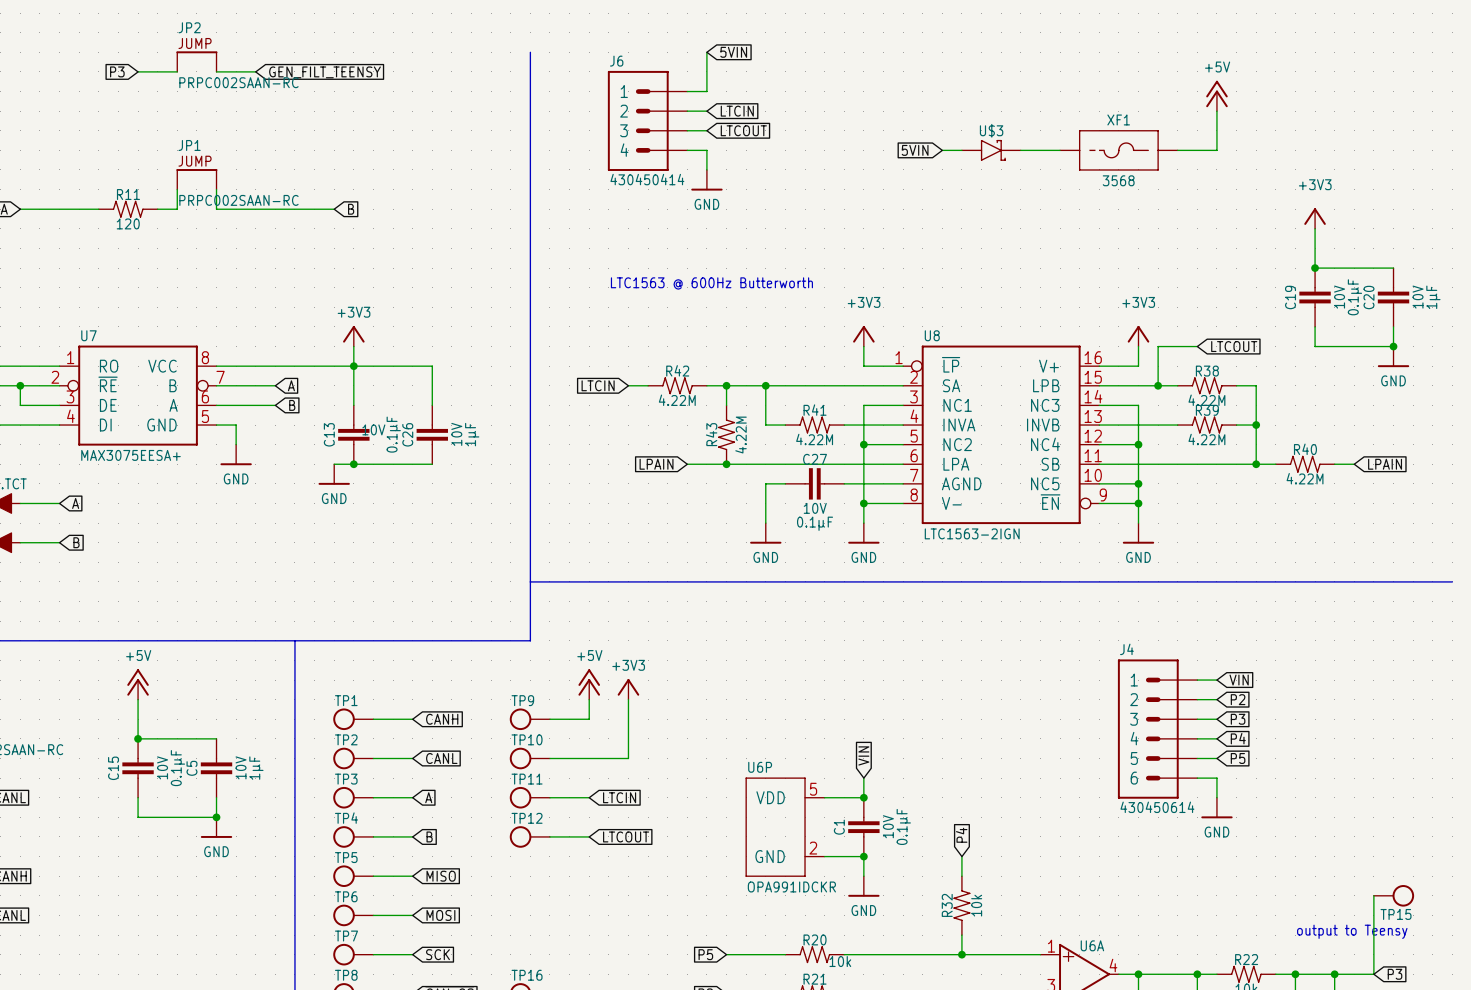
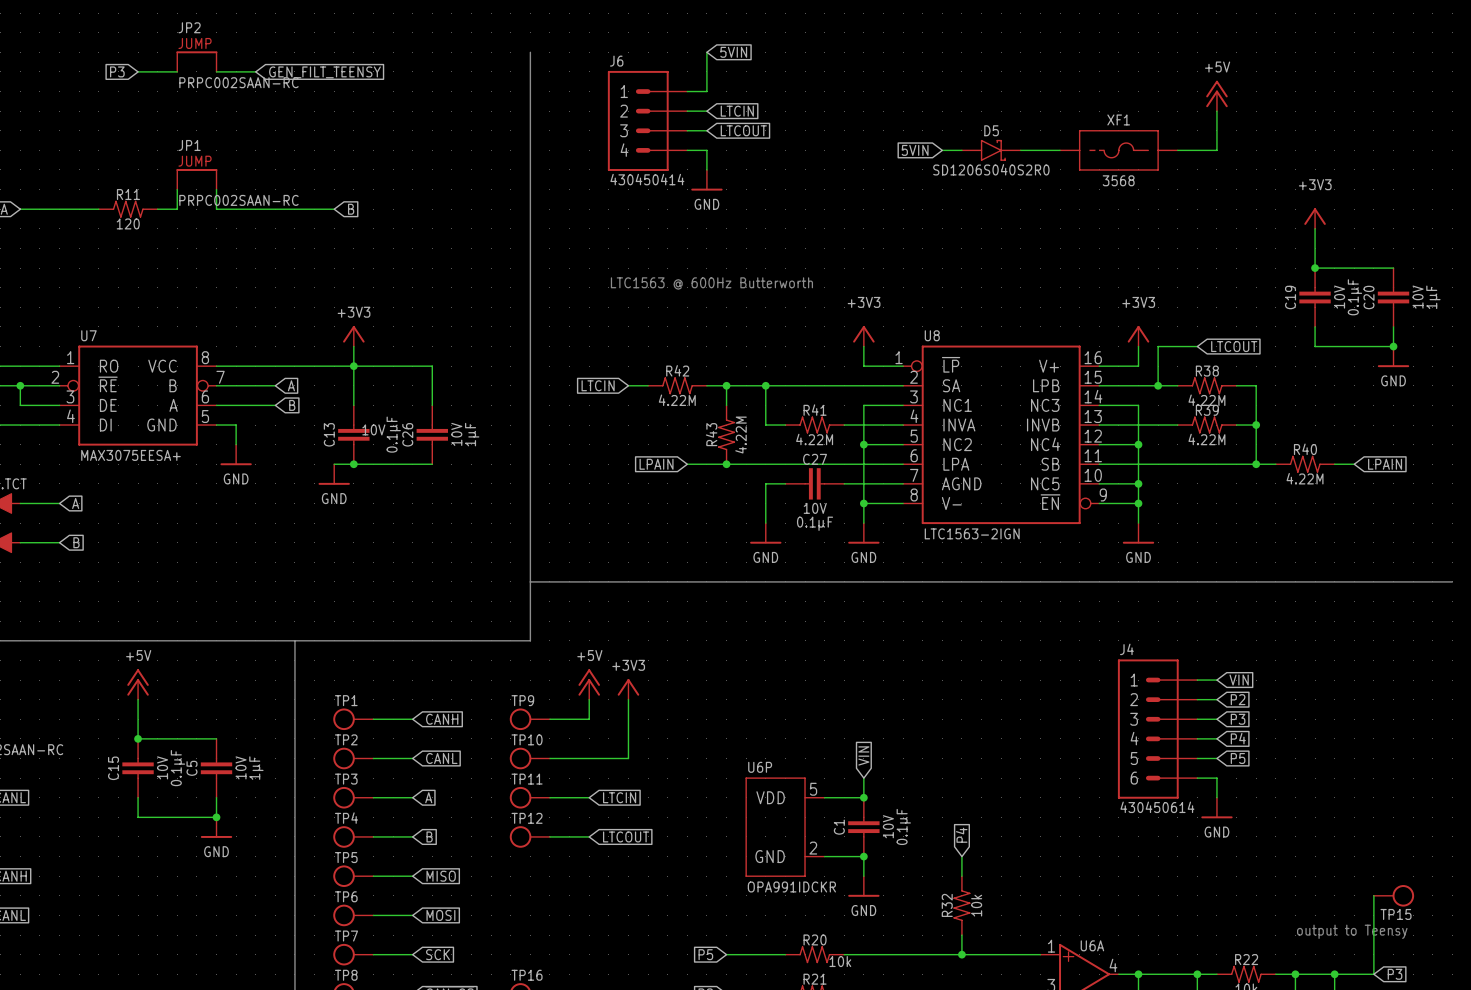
U$3 name: U$3 (991, 130) -> D5 (991, 130)
U$3 text: none -> SD1206S040S2R0 (991, 169)

